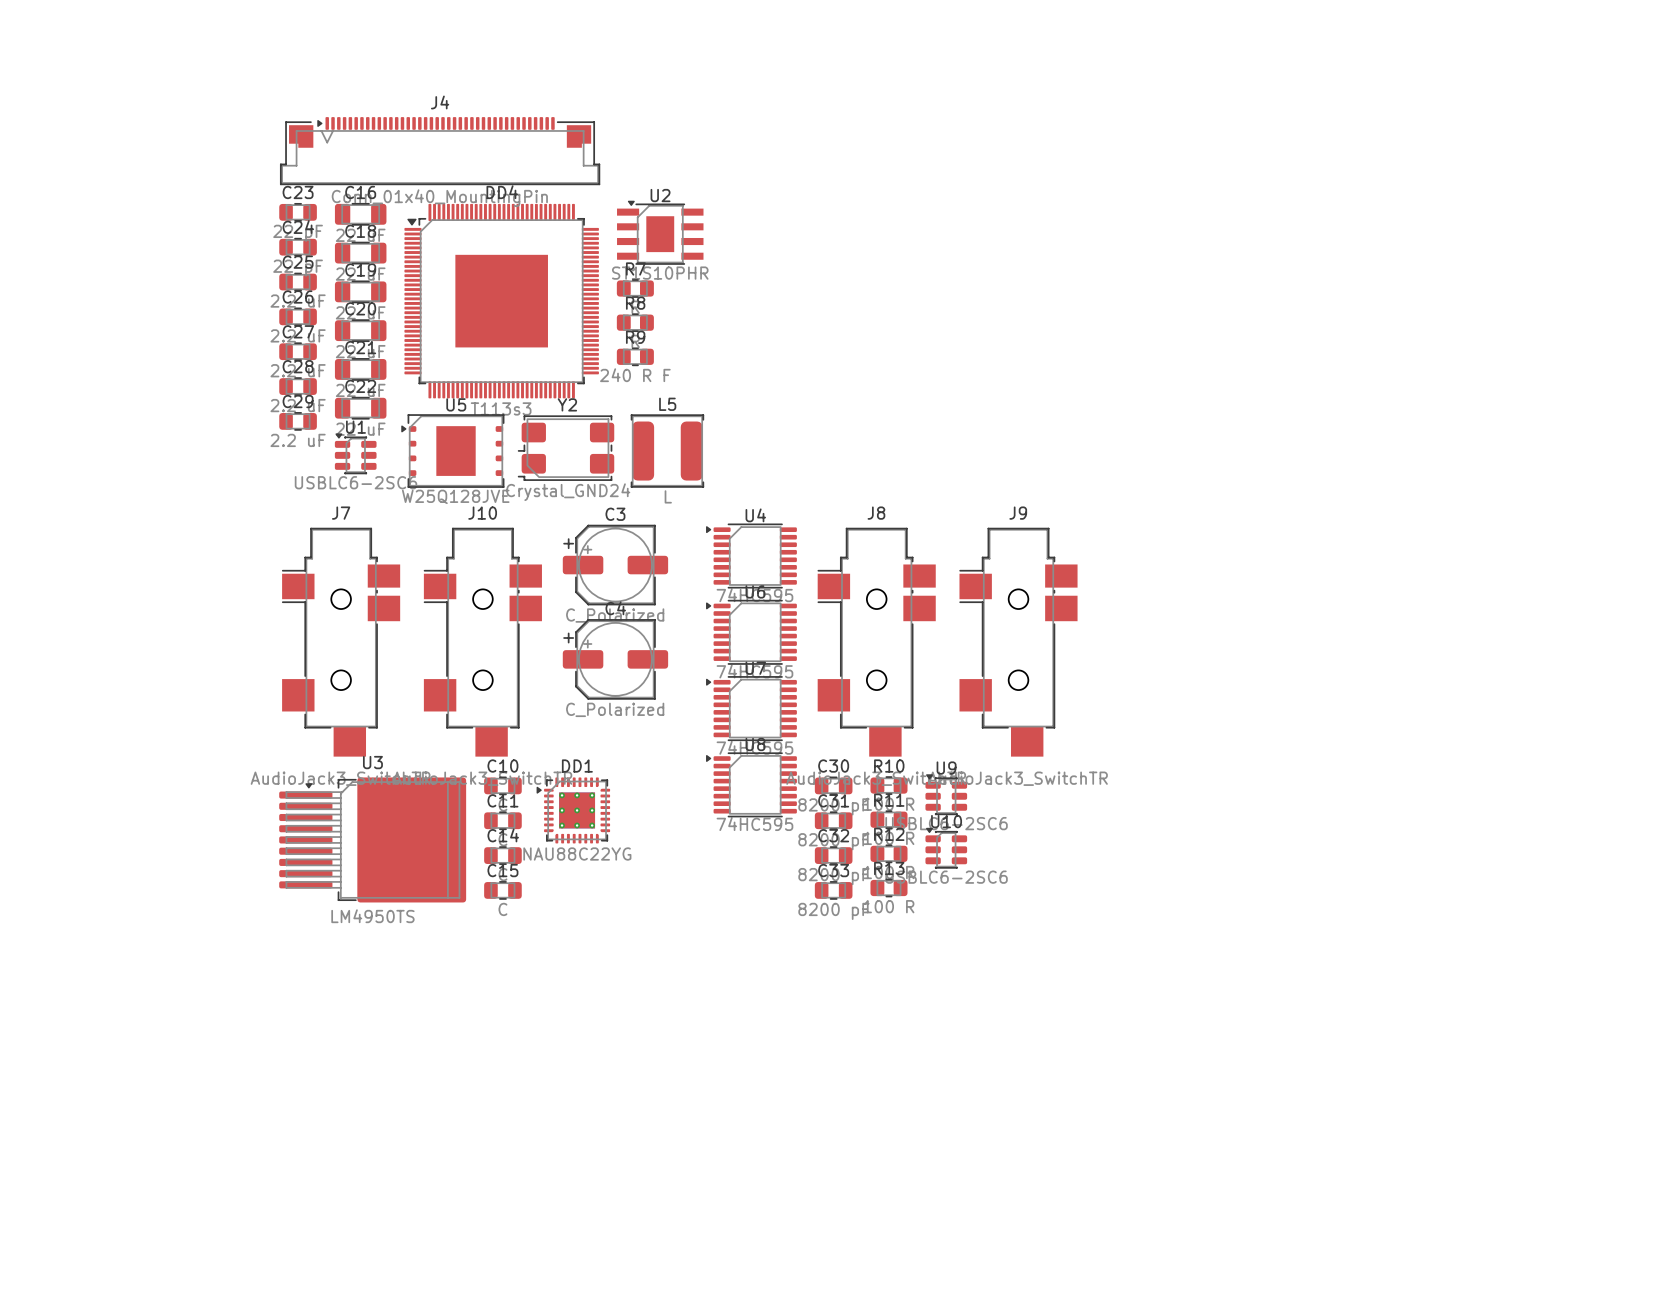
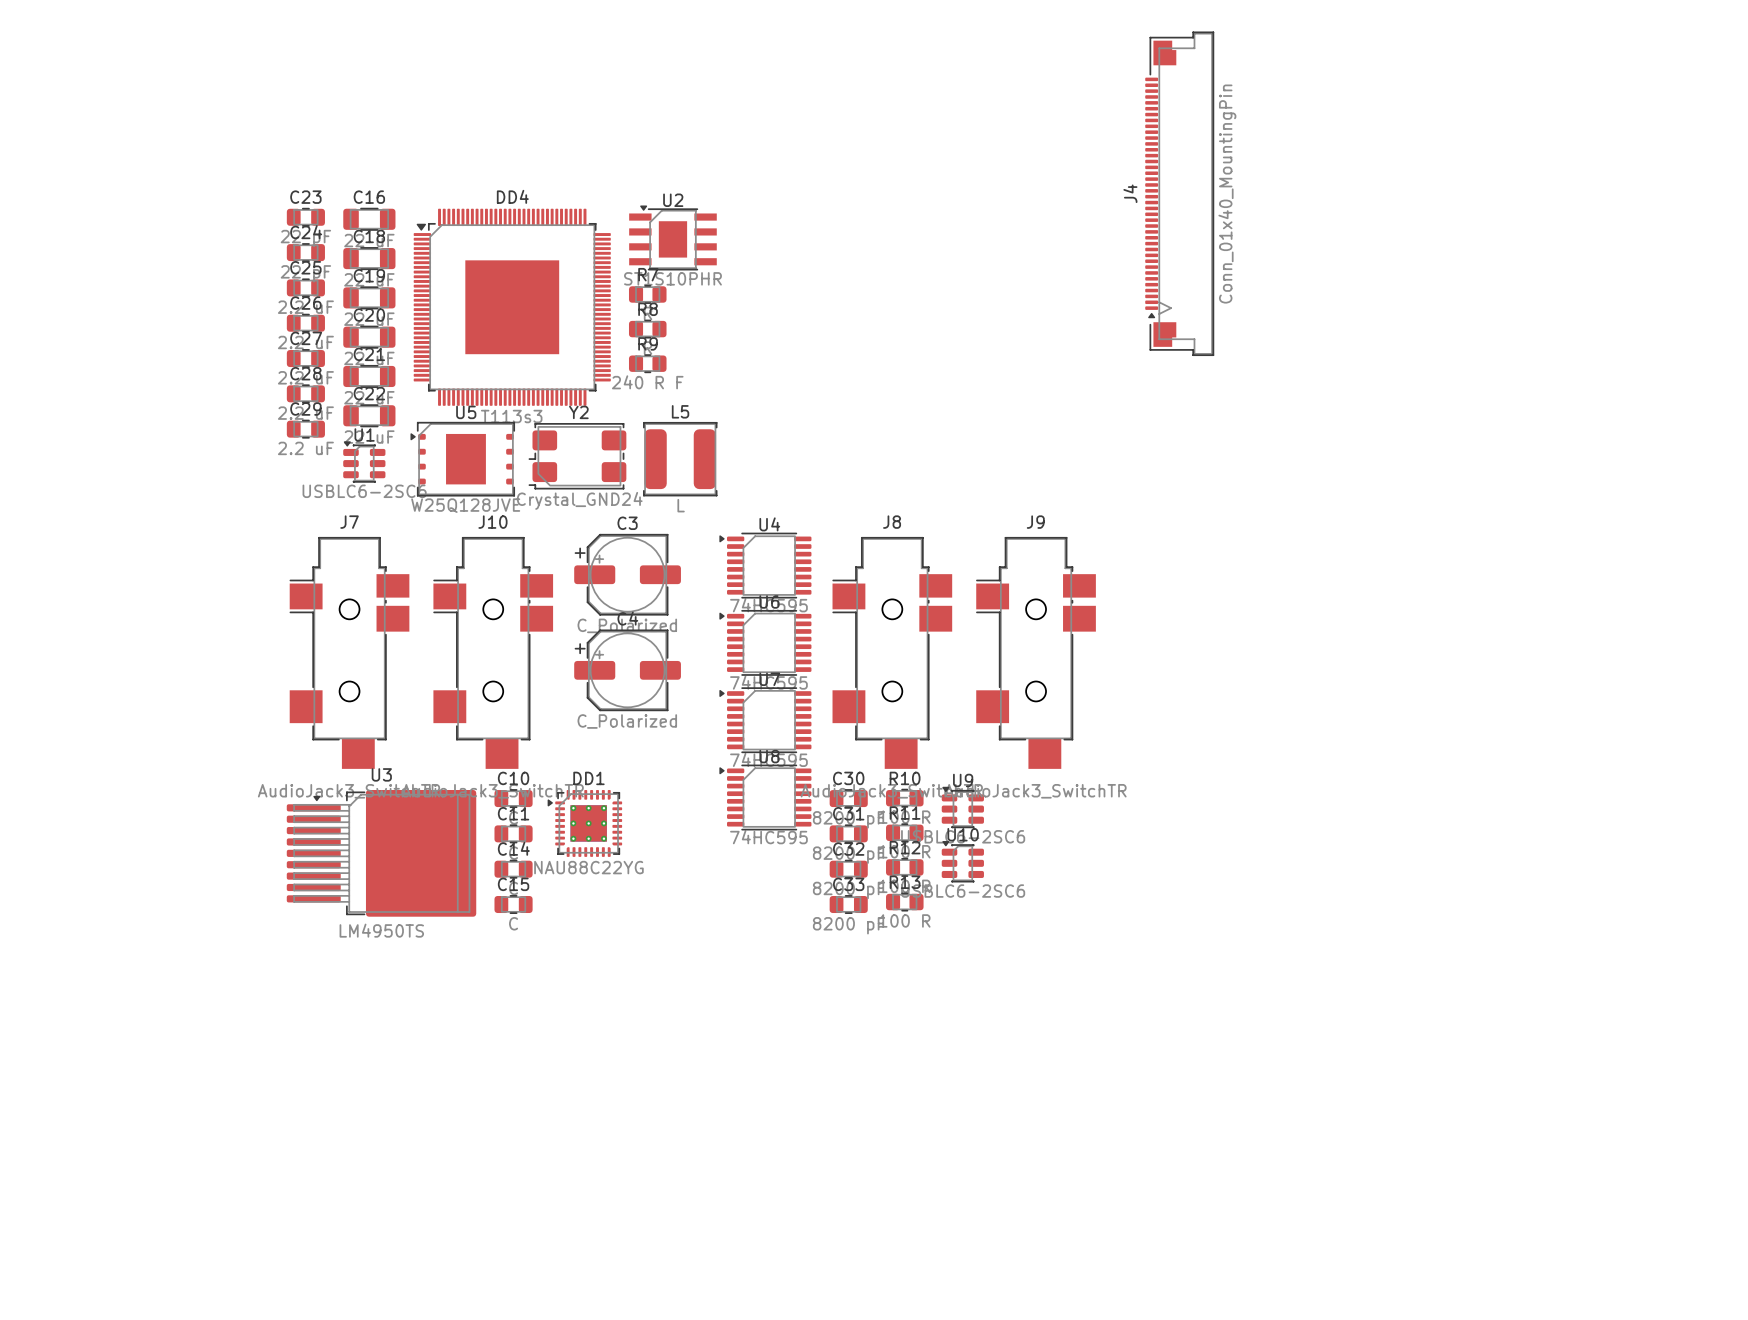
J4 rotation: 0° (440, 151) -> 90° counterclockwise (1179, 193)
J4 position: (440, 151) -> (1179, 193)

